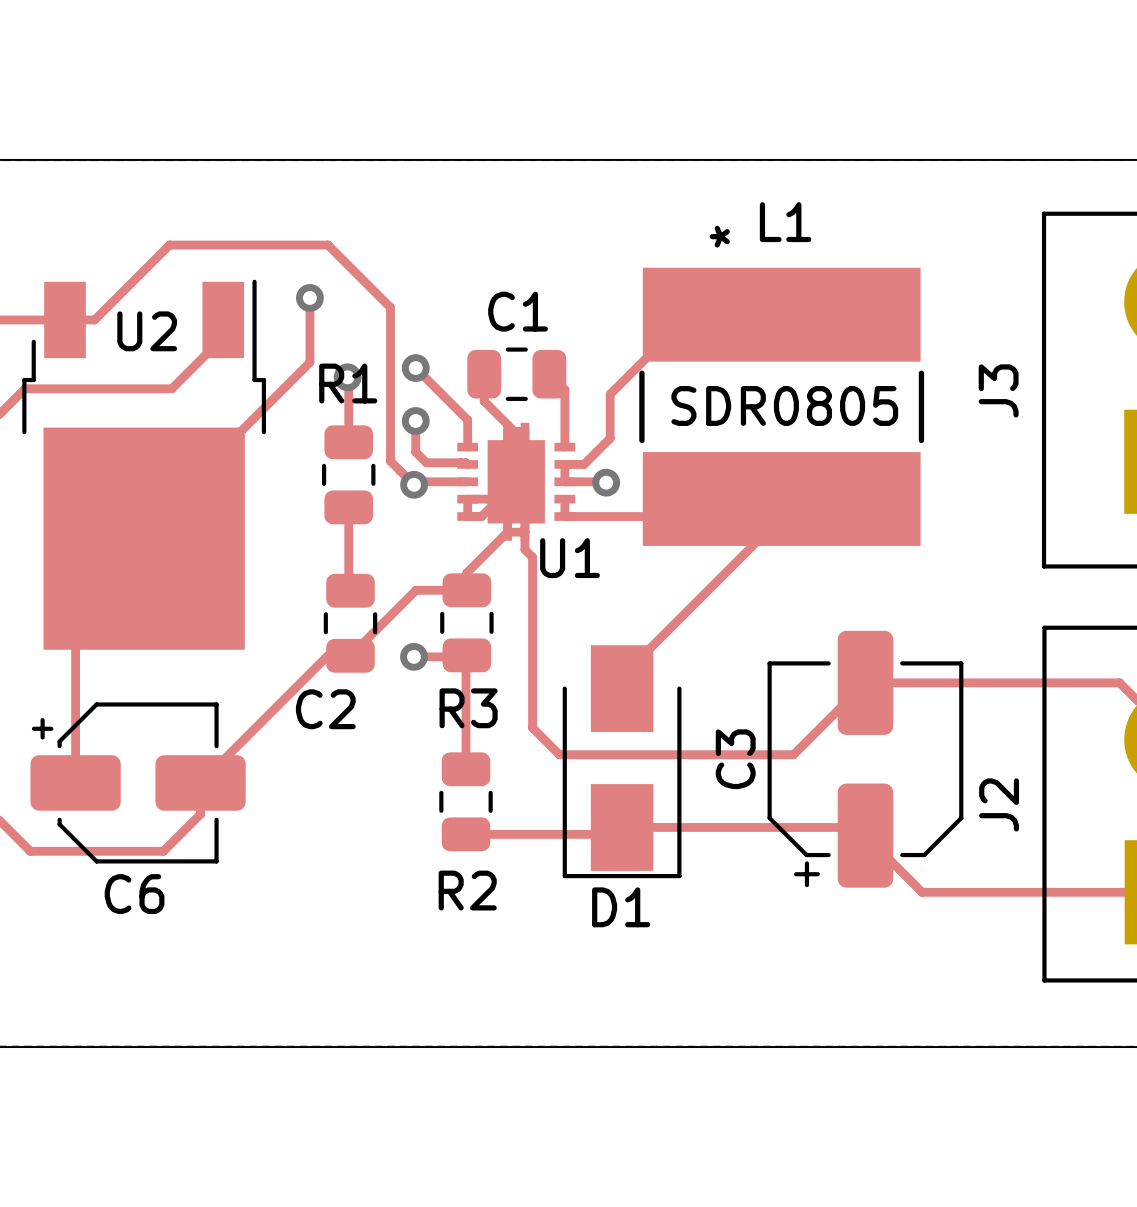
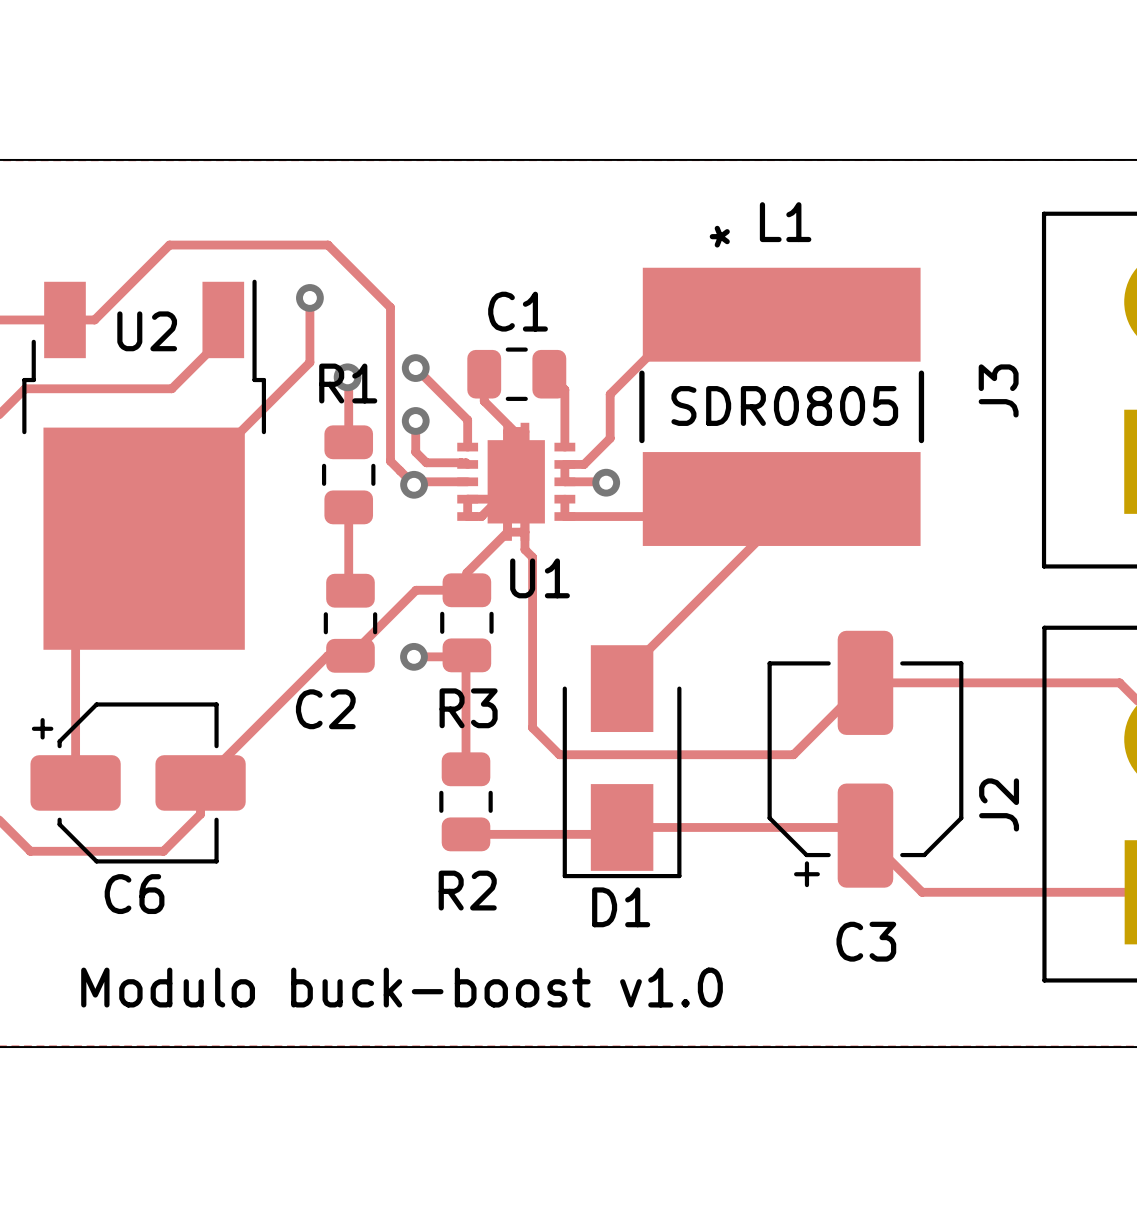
U1 name position: U1 (570, 558) -> U1 (540, 578)
C3 name rotation: 0° (735, 759) -> 90° clockwise (866, 941)
C3 name position: C3 (735, 759) -> C3 (866, 941)
text: none -> Modulo buck-boost v1.0 (402, 987)

